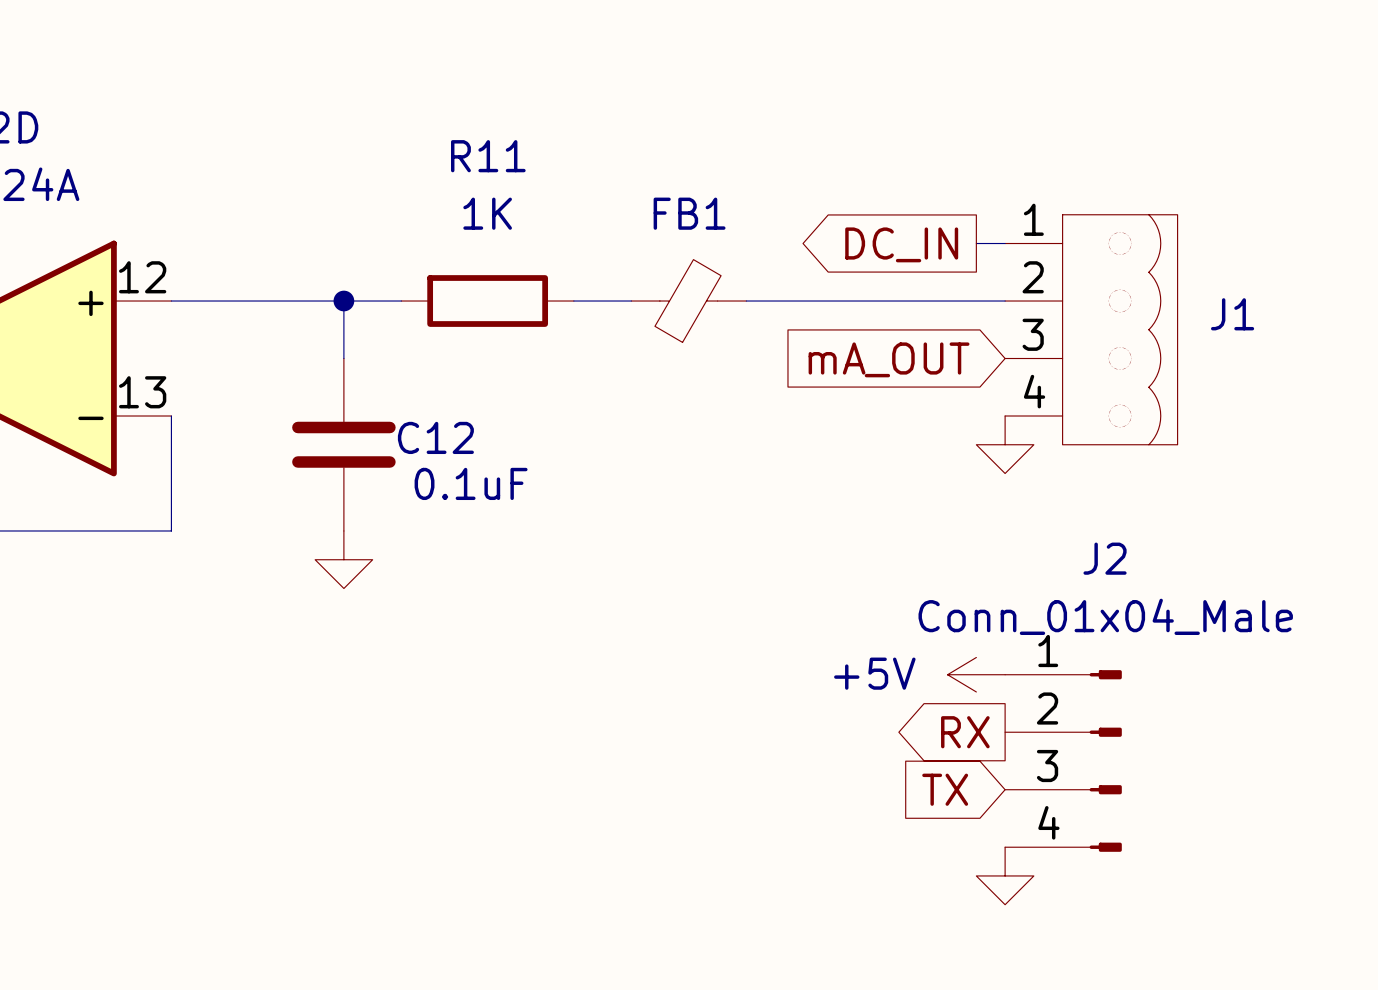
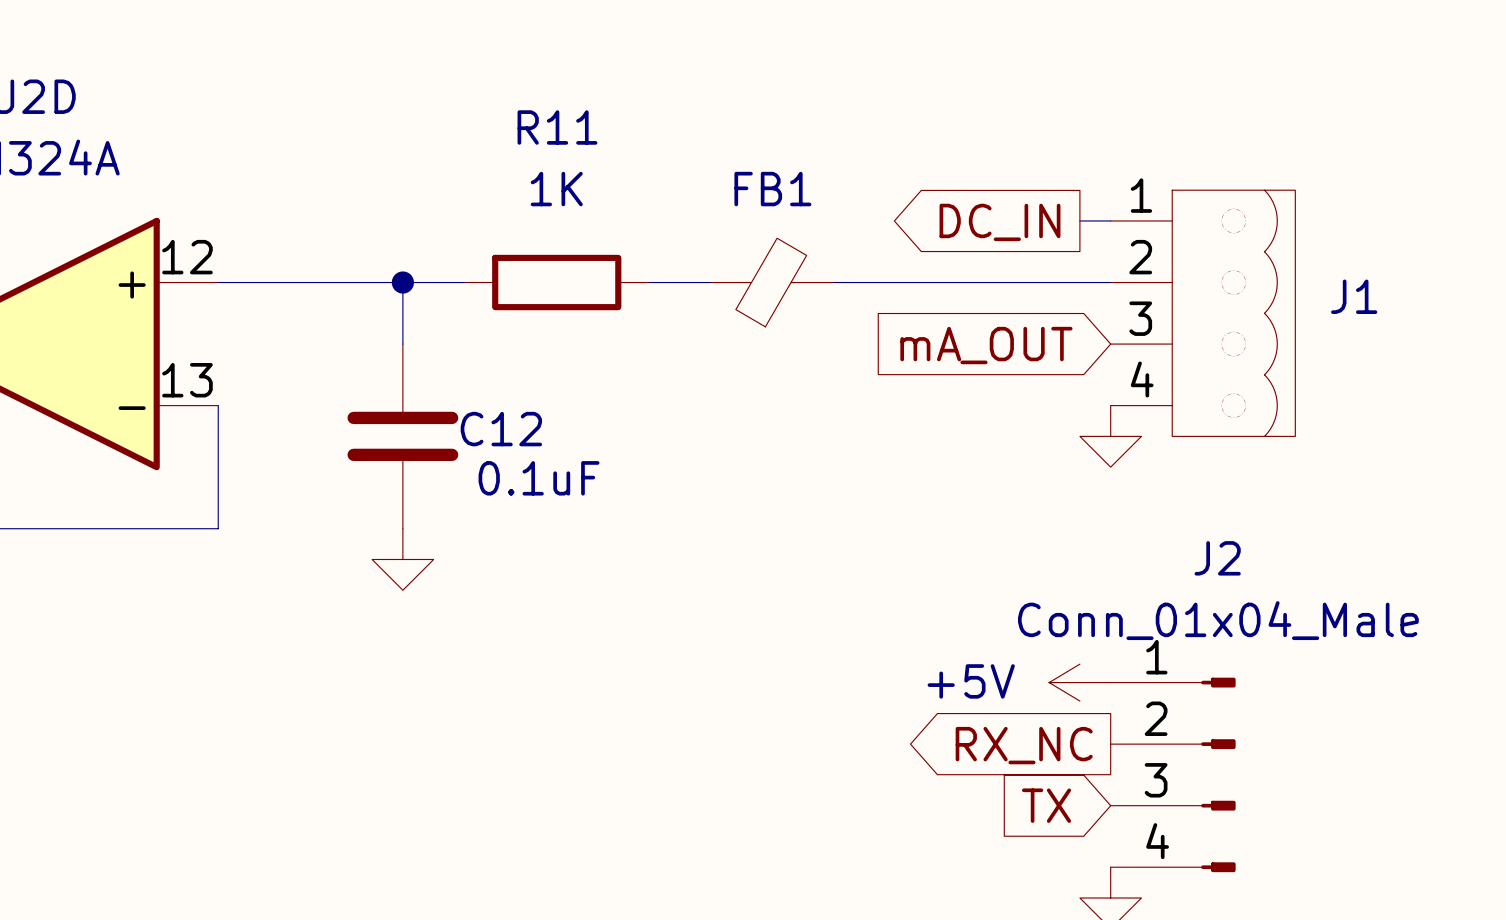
global label: RX (965, 732) -> RX_NC (1024, 745)

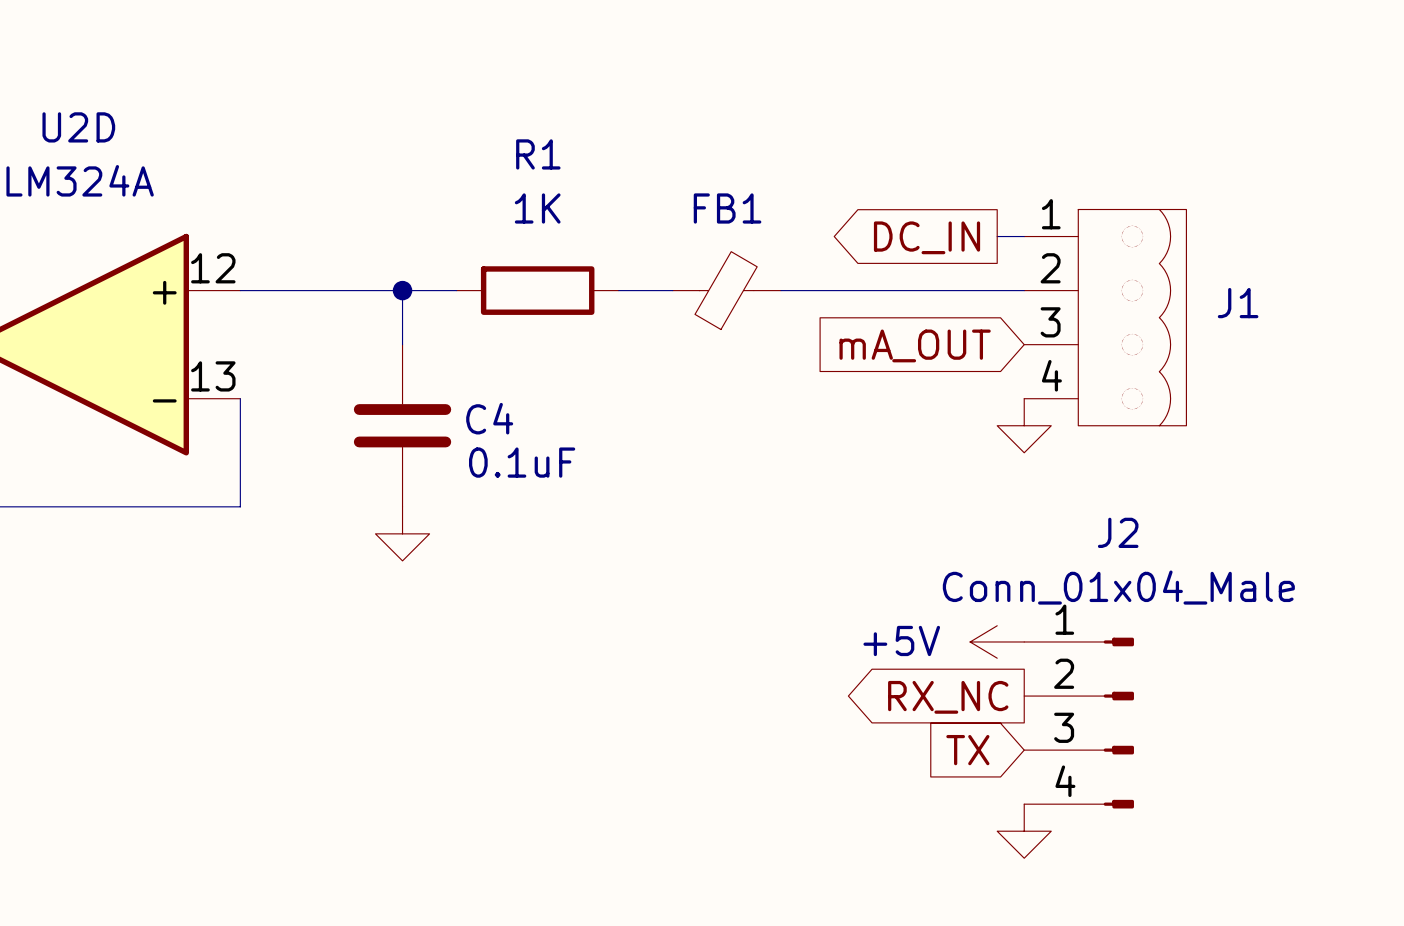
R11 name: R11 (557, 127) -> R1 (538, 154)
C12 name: C12 (501, 429) -> C4 (489, 418)

